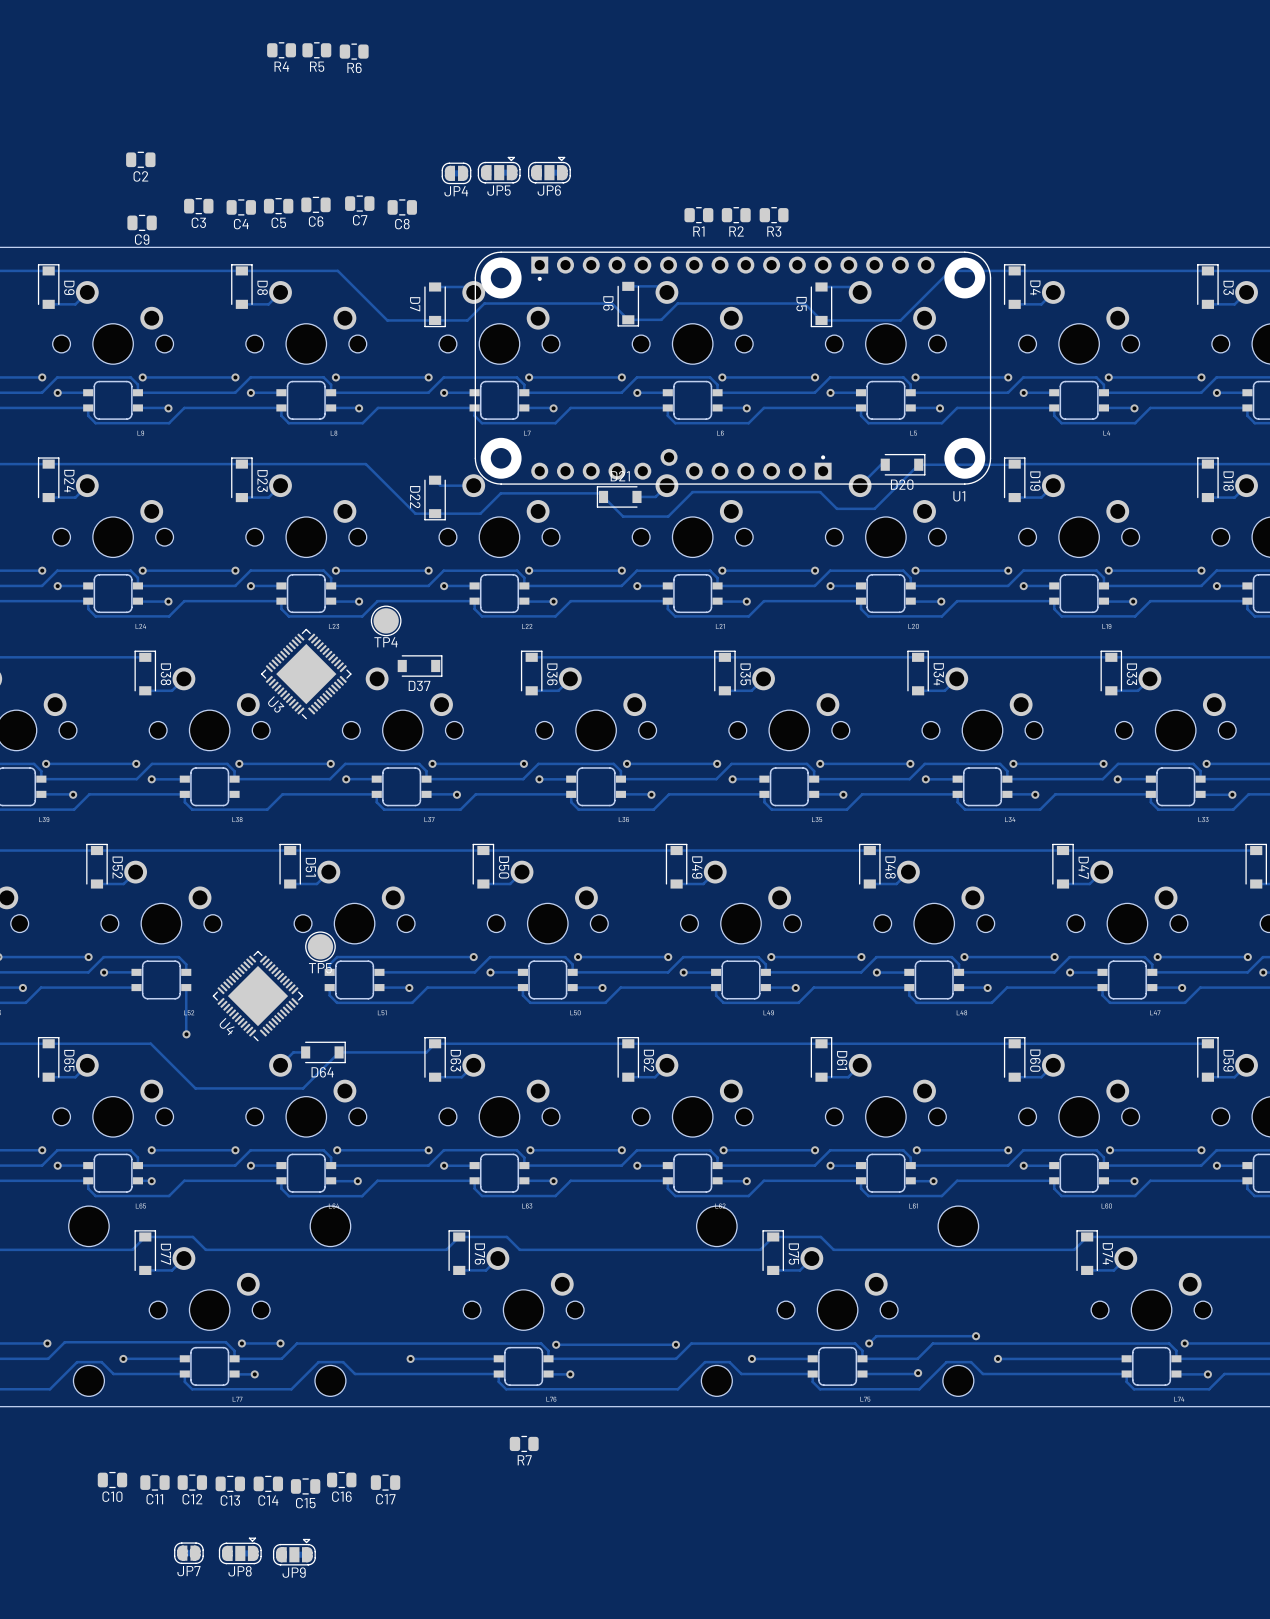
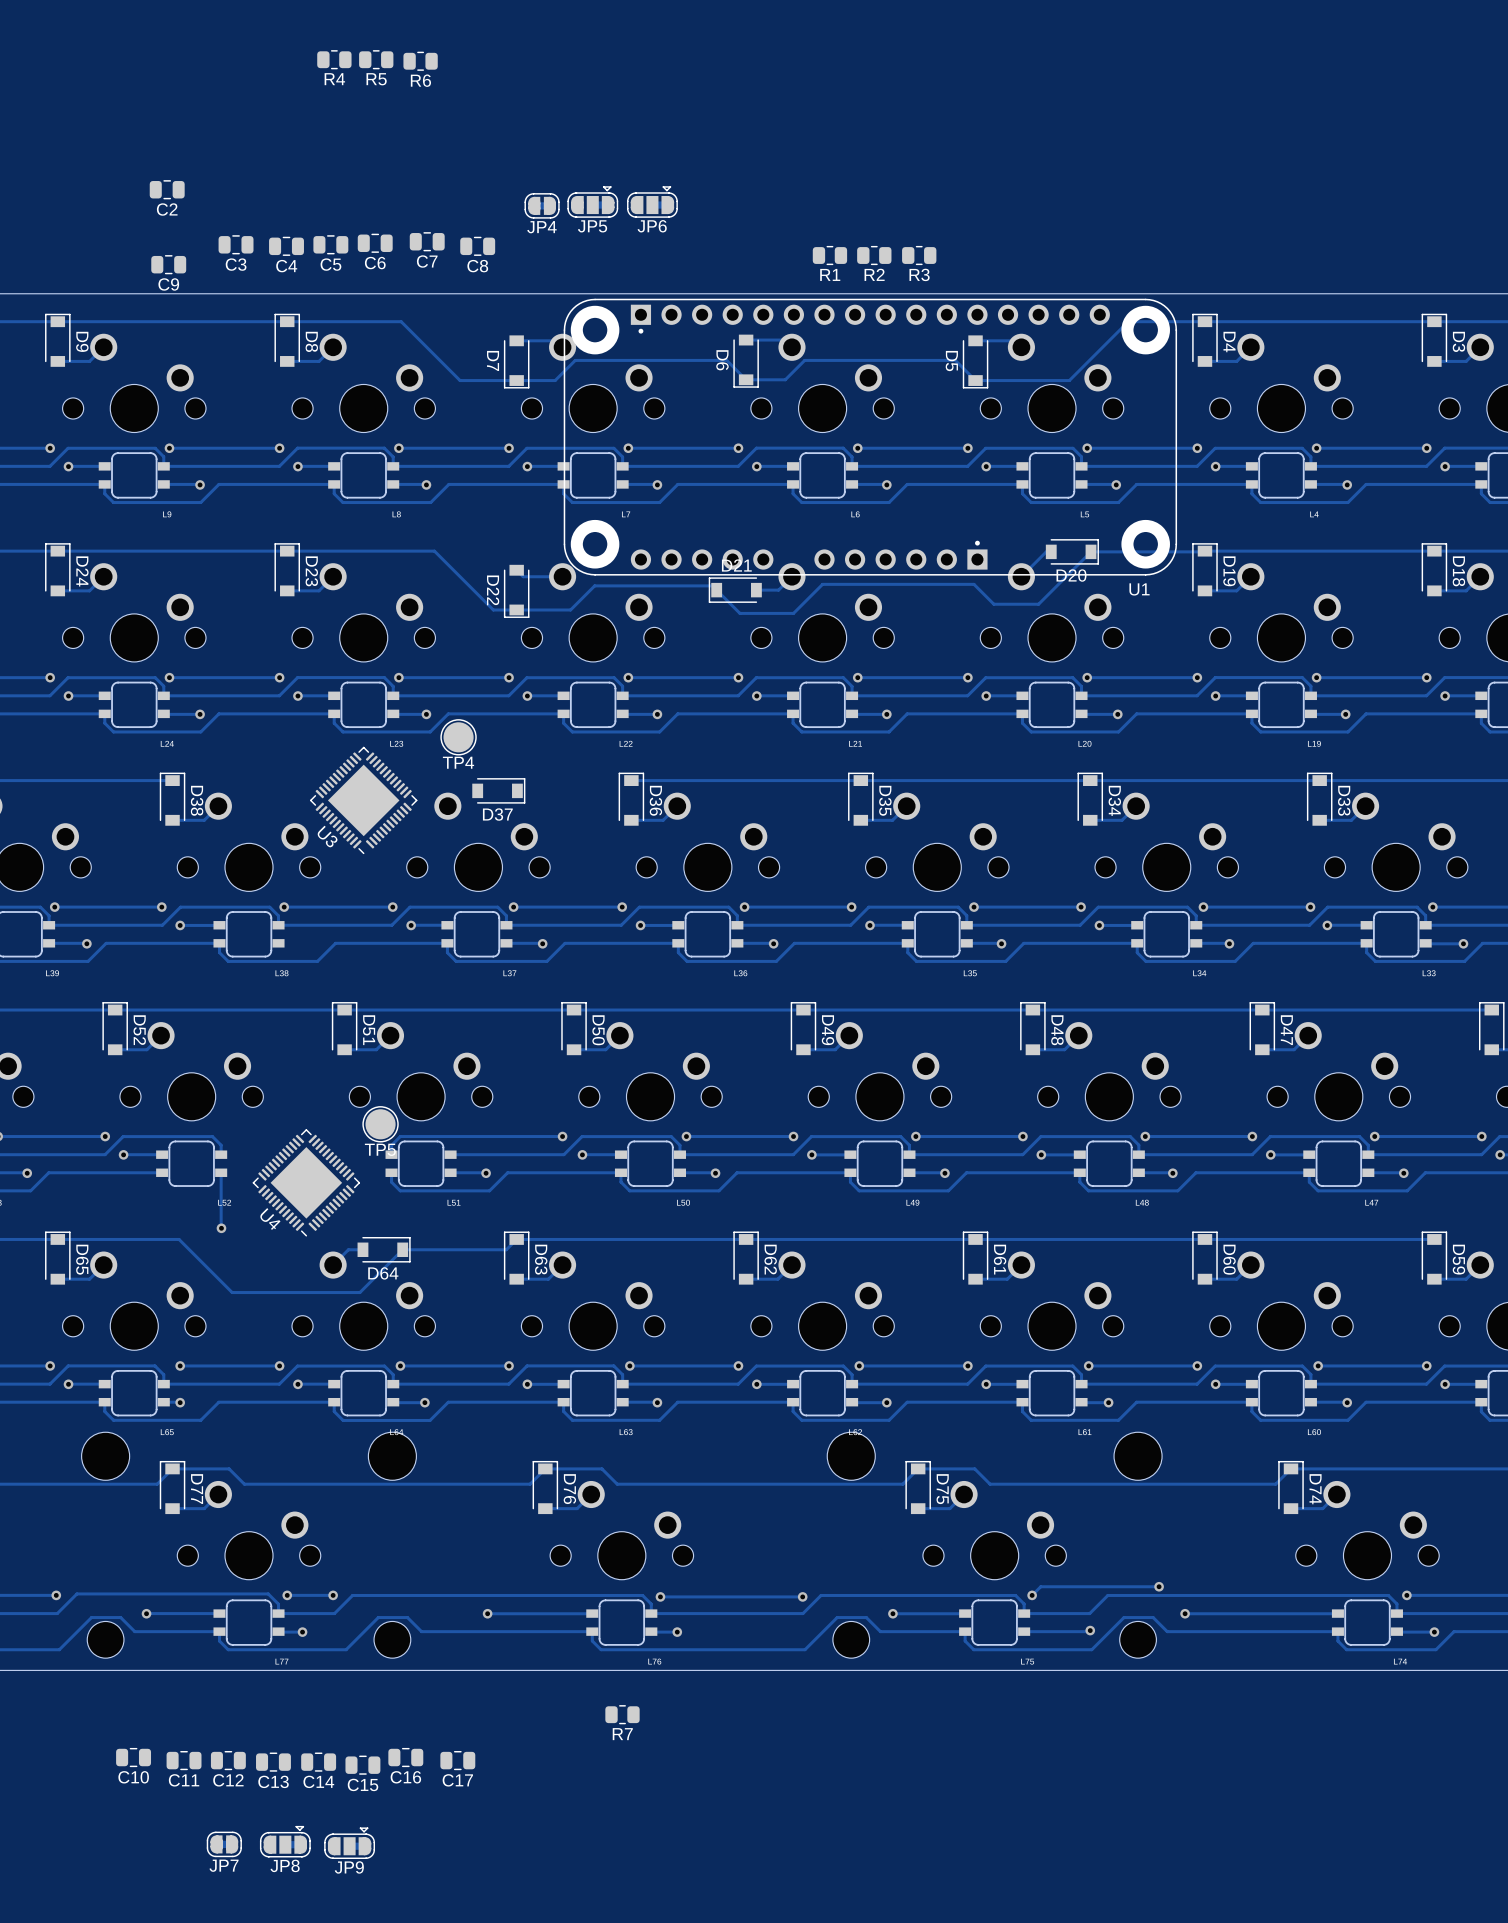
U1 footprint: [474, 251, 992, 485] -> [563, 298, 1178, 576]

